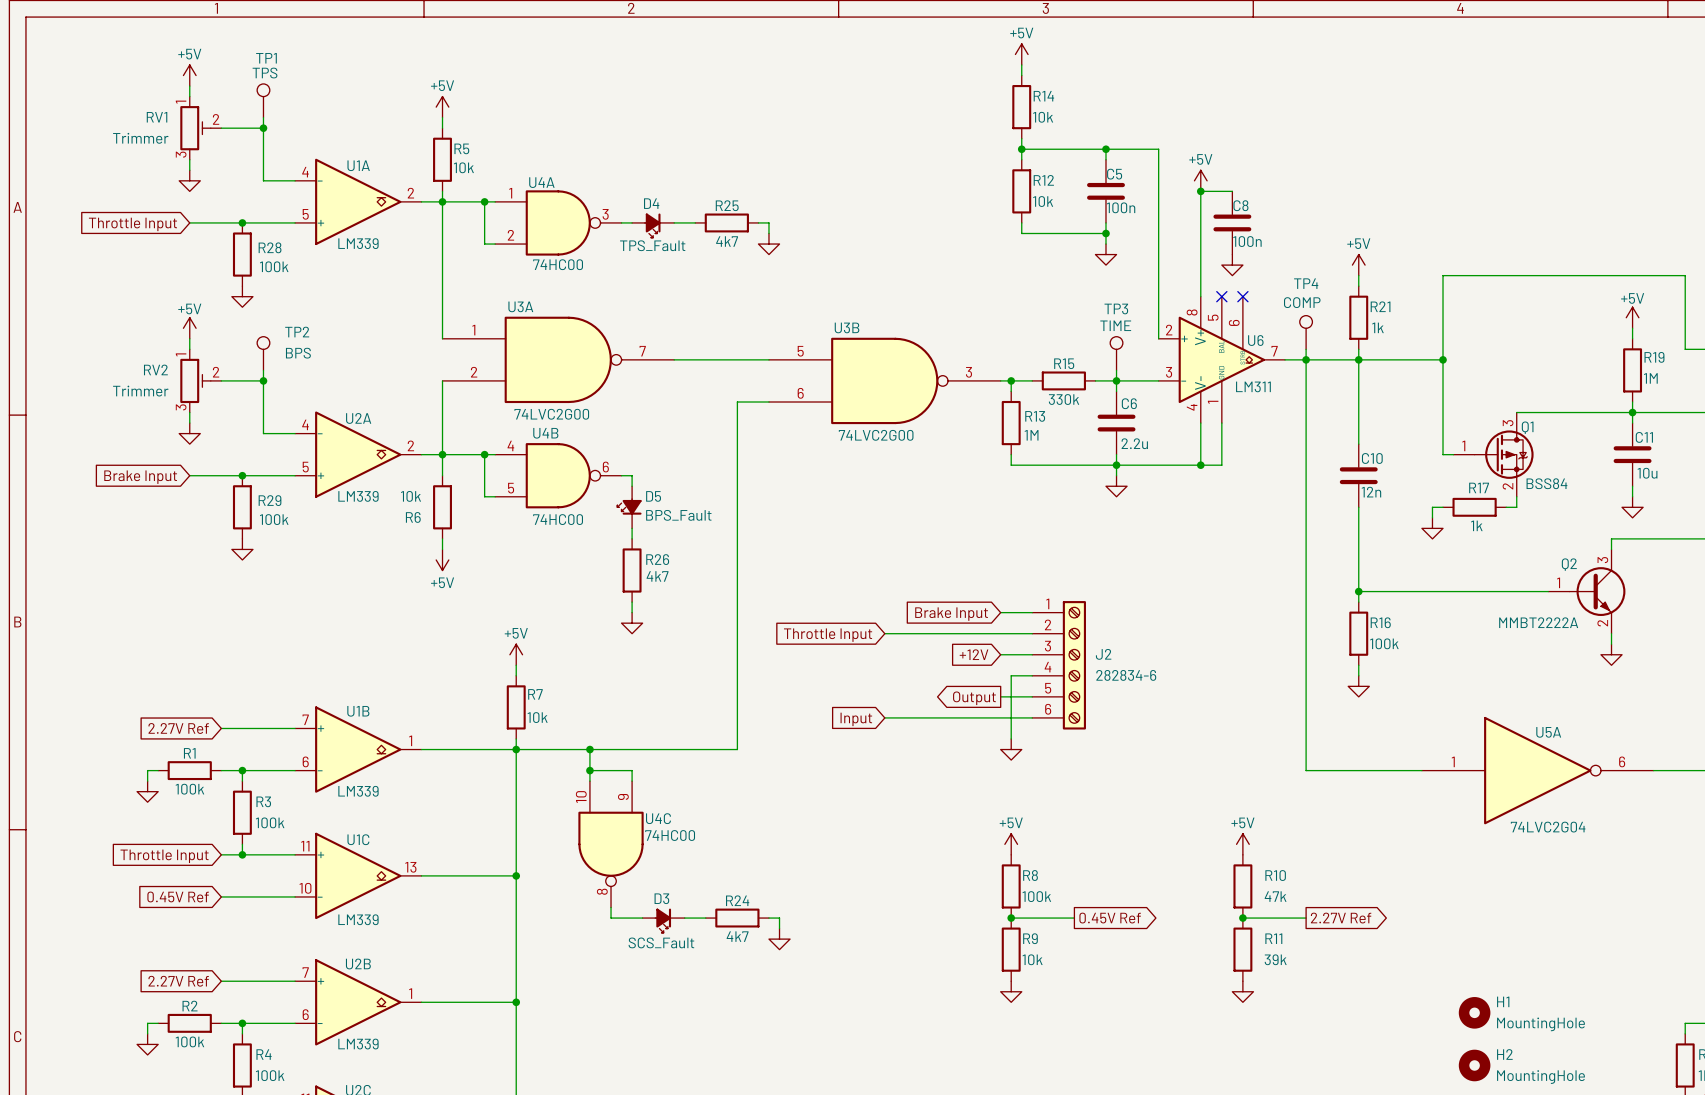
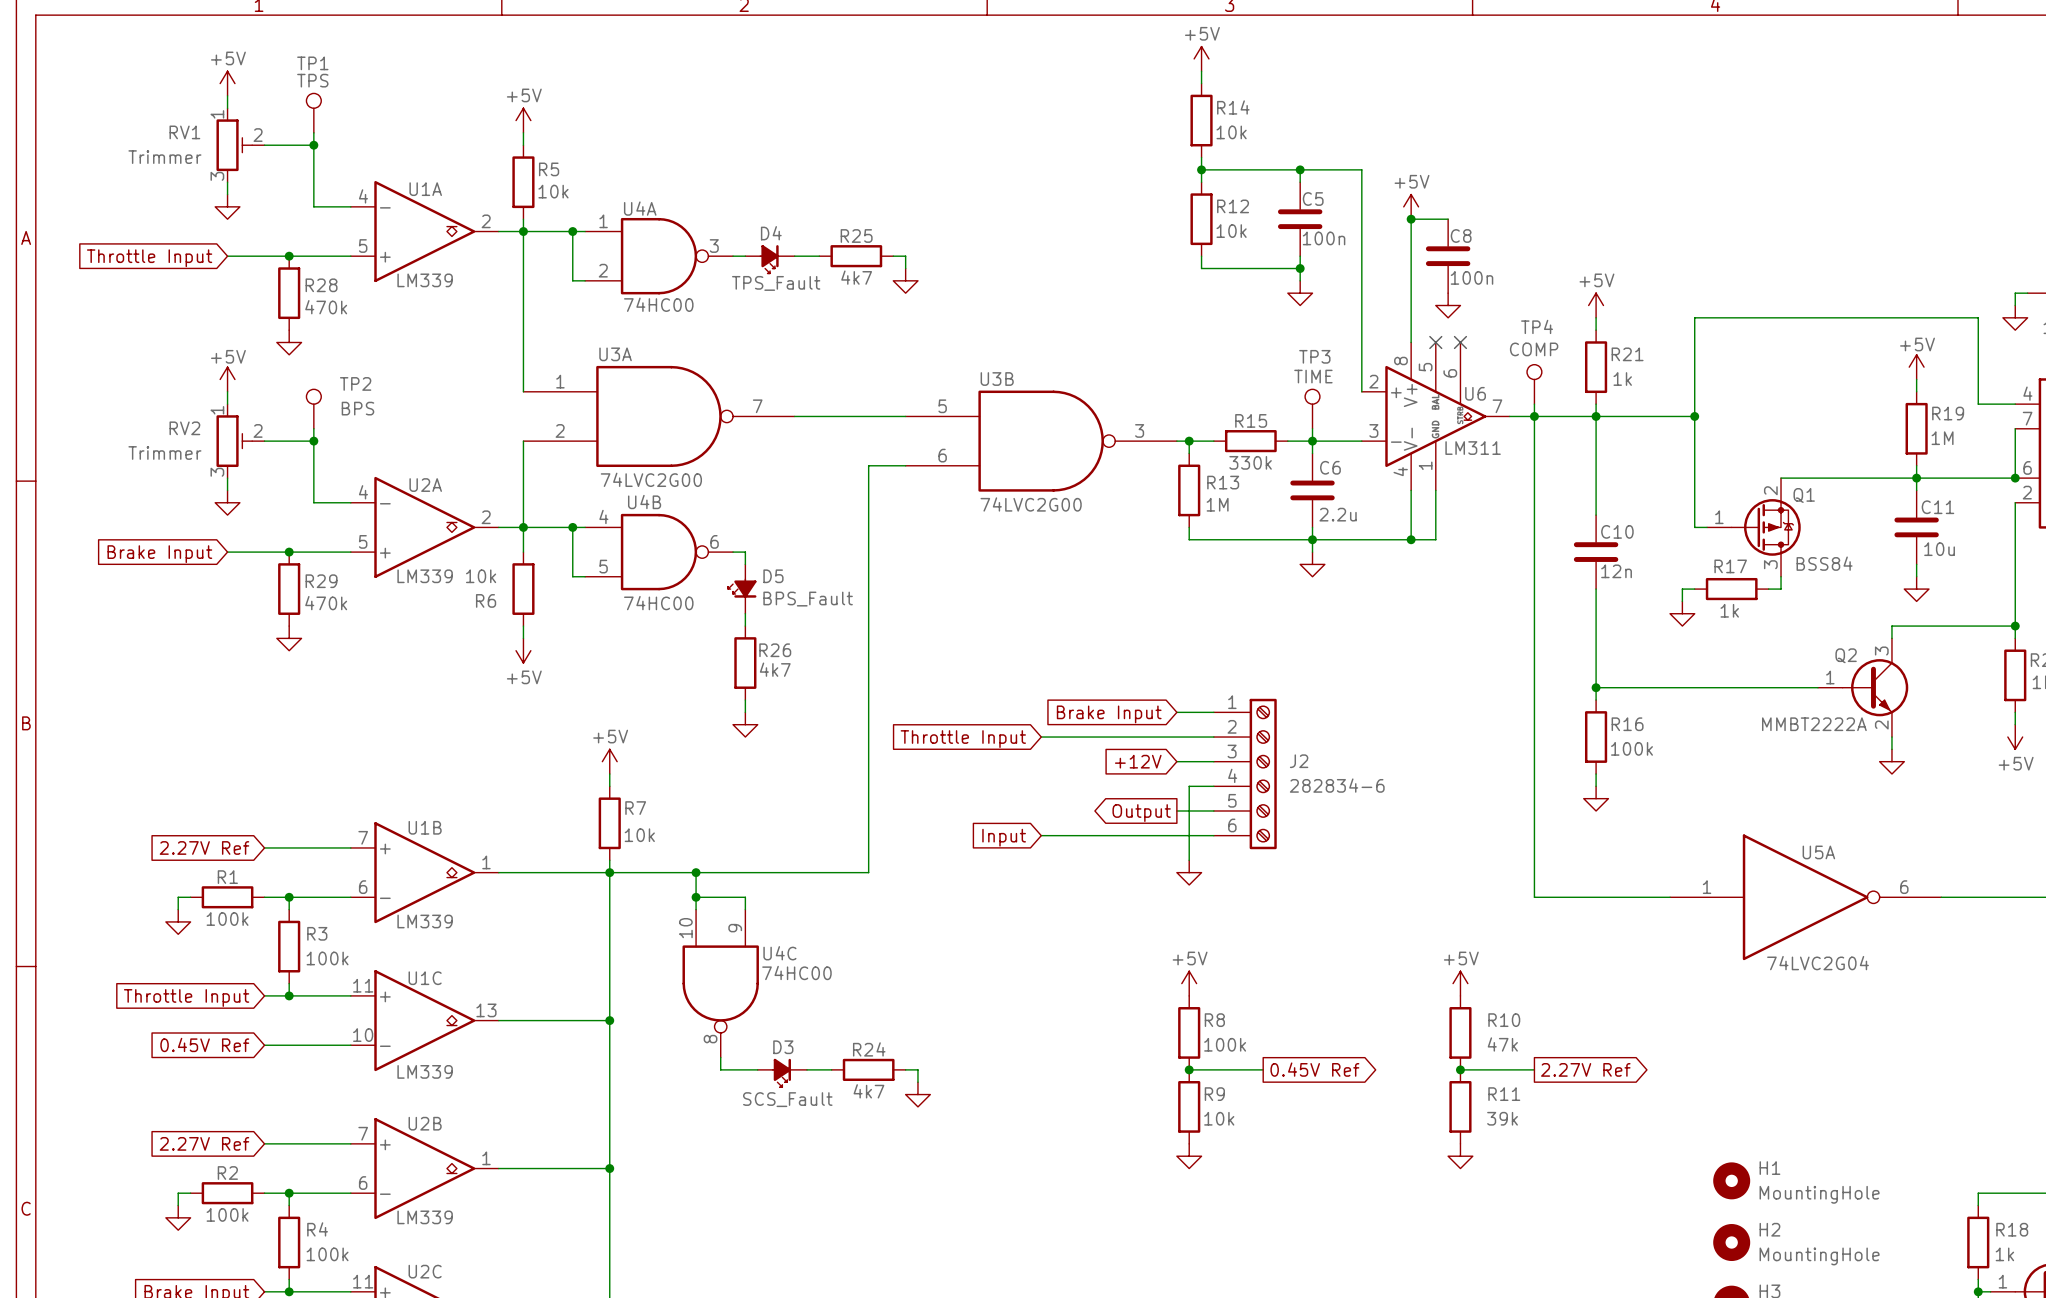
R28 value: 100k (274, 266) -> 470k (326, 307)
Q1 flip: as is (1504, 454) -> up-down (1766, 527)
R29 value: 100k (274, 519) -> 470k (326, 603)

